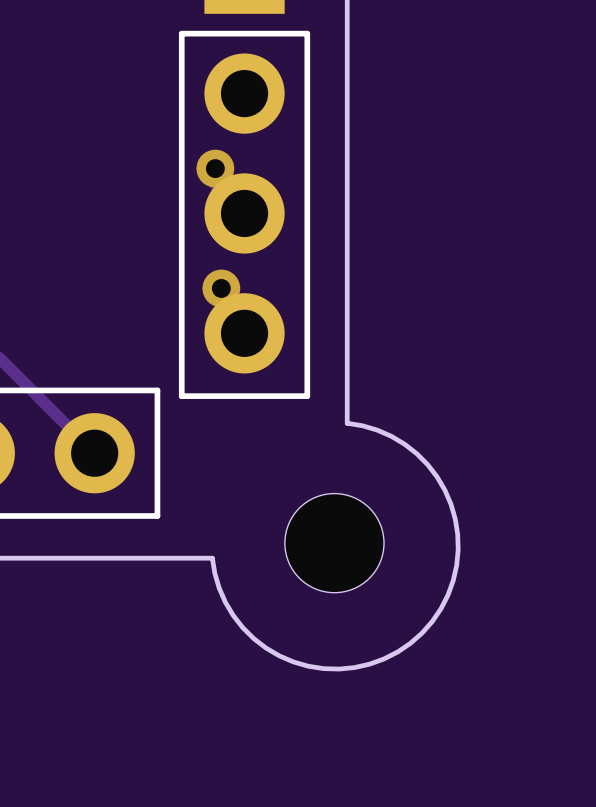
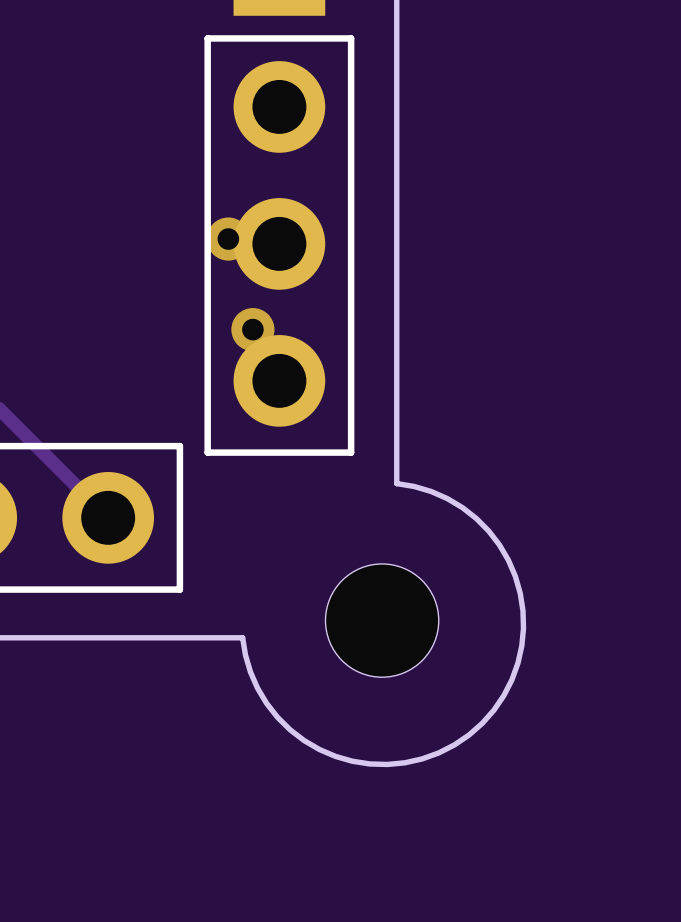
via position: (215, 168) -> (228, 239)

